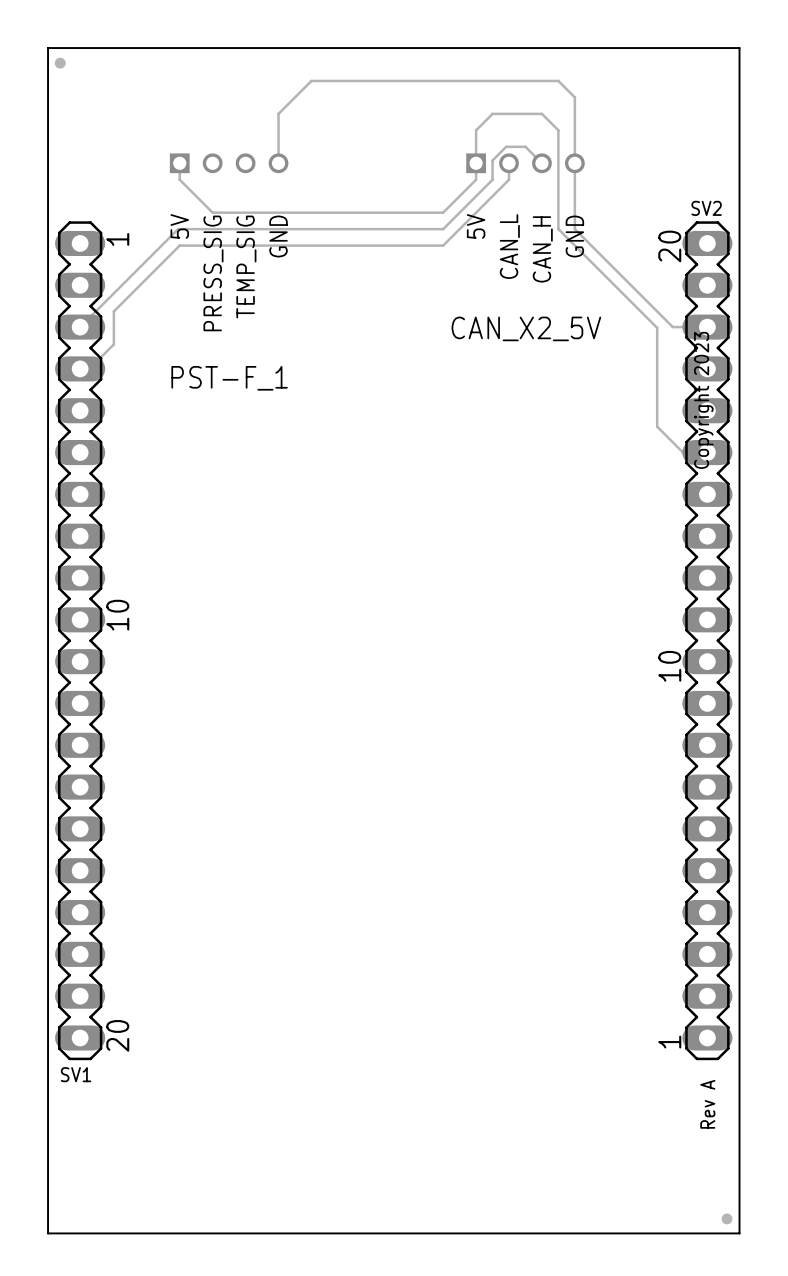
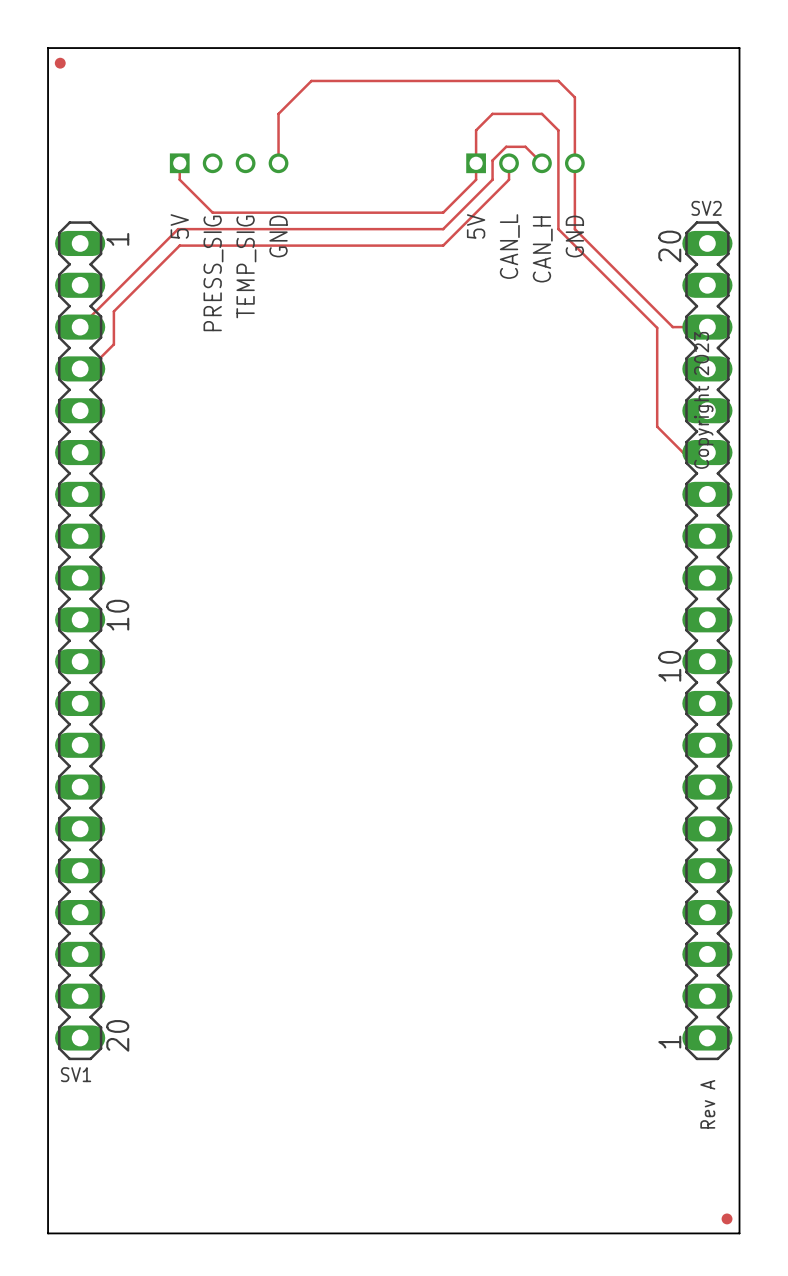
text: CAN_X2_5V (526, 328) -> none
text: PST-F_1 (229, 378) -> none

